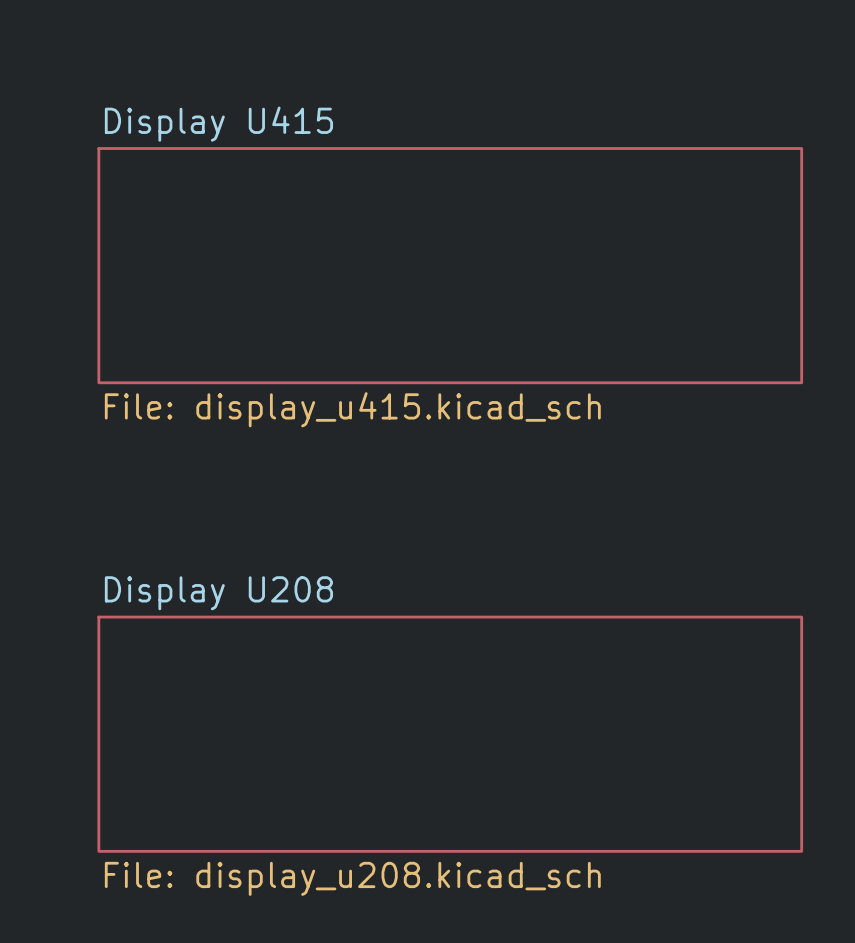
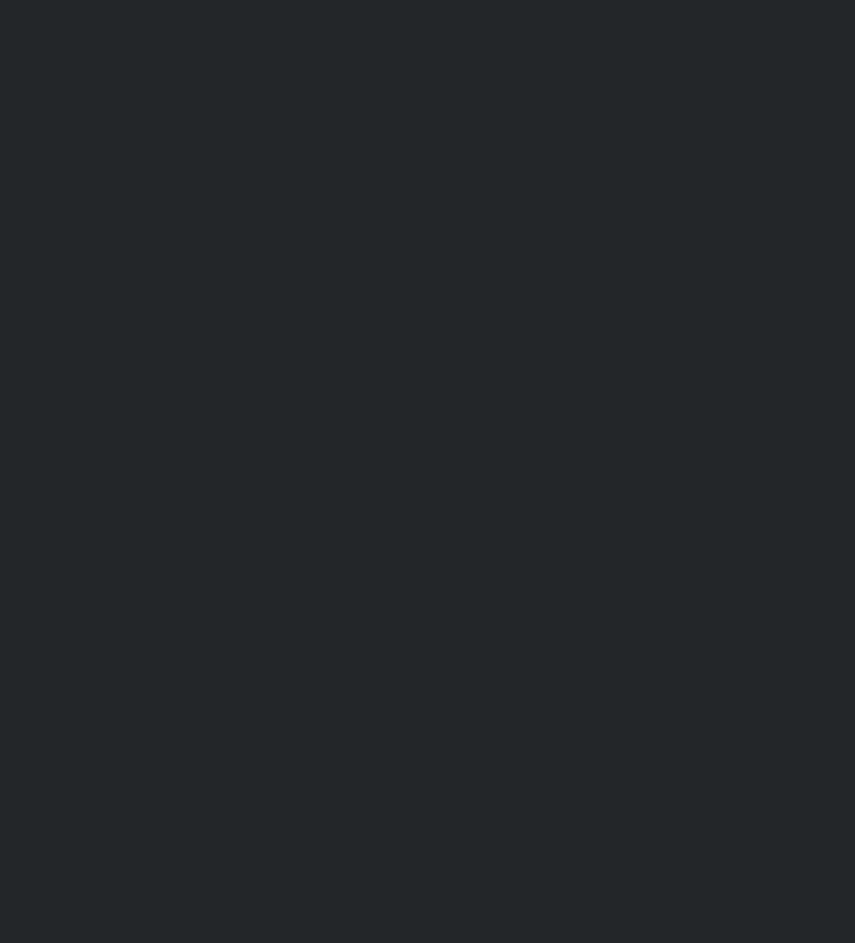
sheet Display U415: File: display_u415.kicad_sch (450, 265) -> none
sheet Display U208: File: display_u208.kicad_sch (450, 734) -> none

